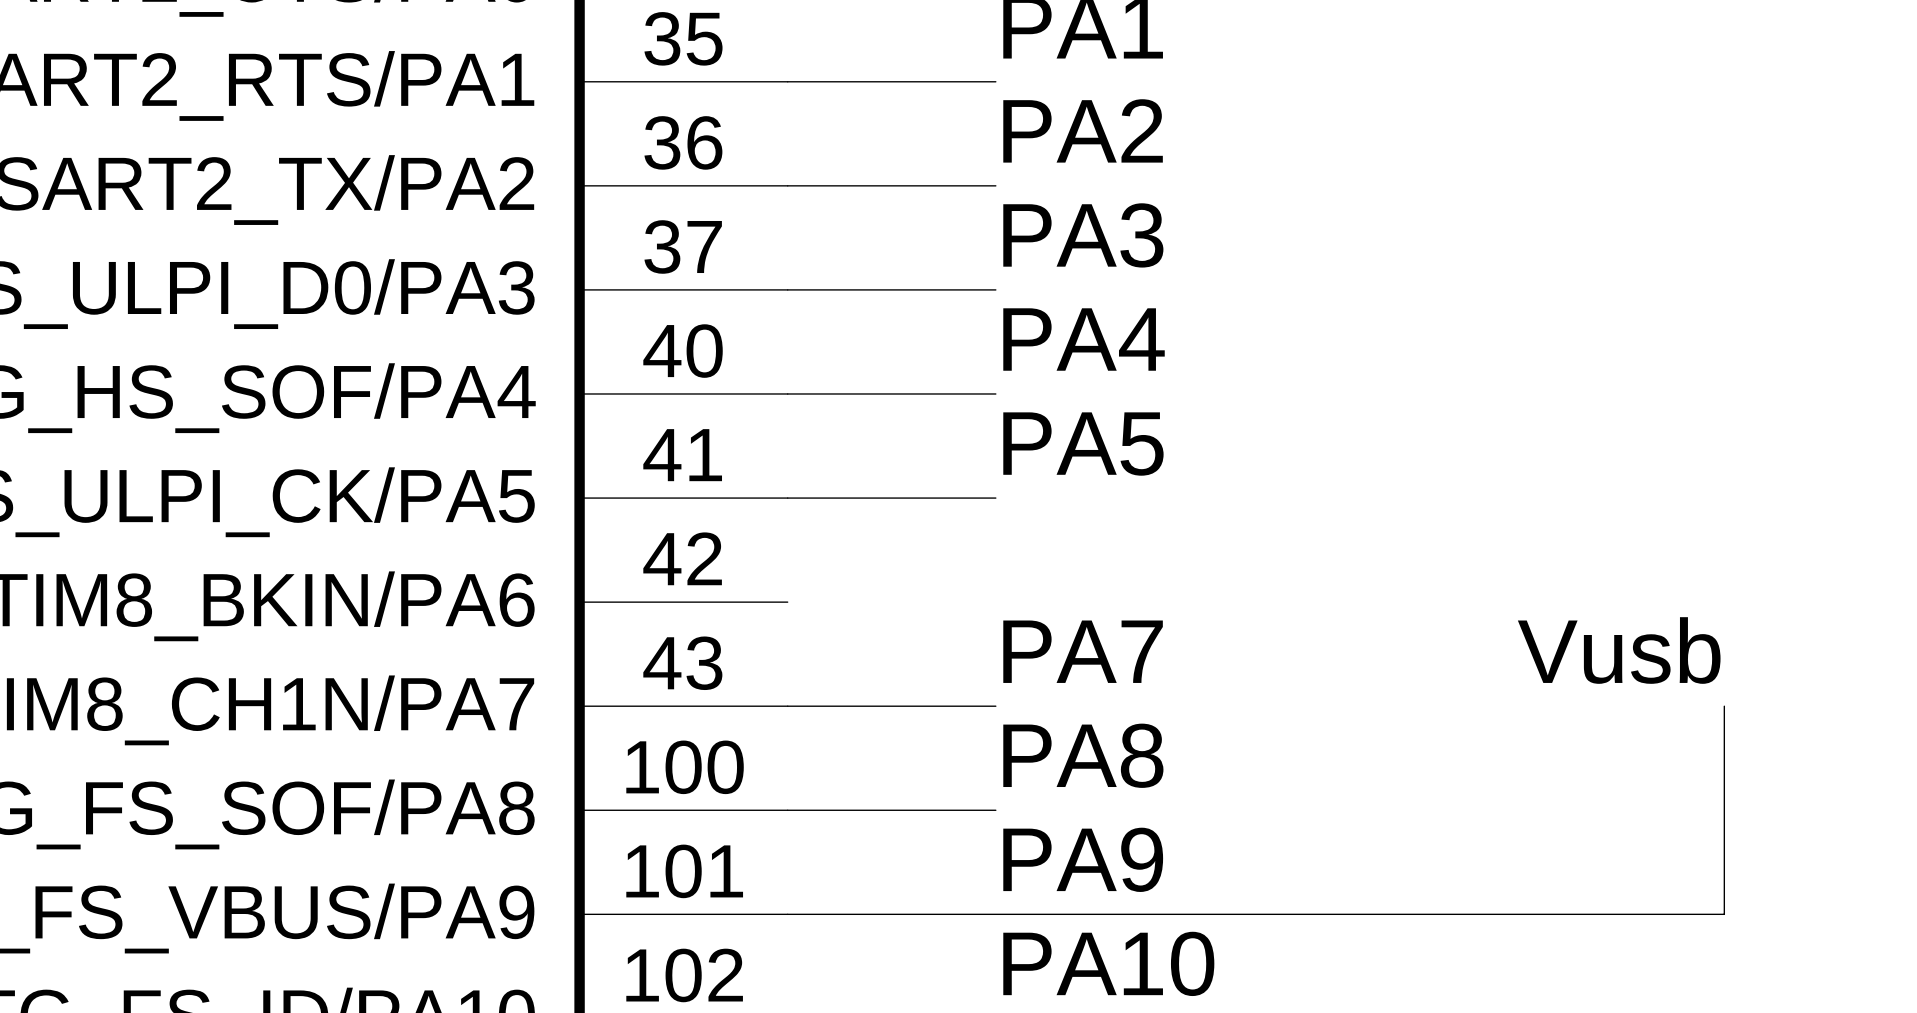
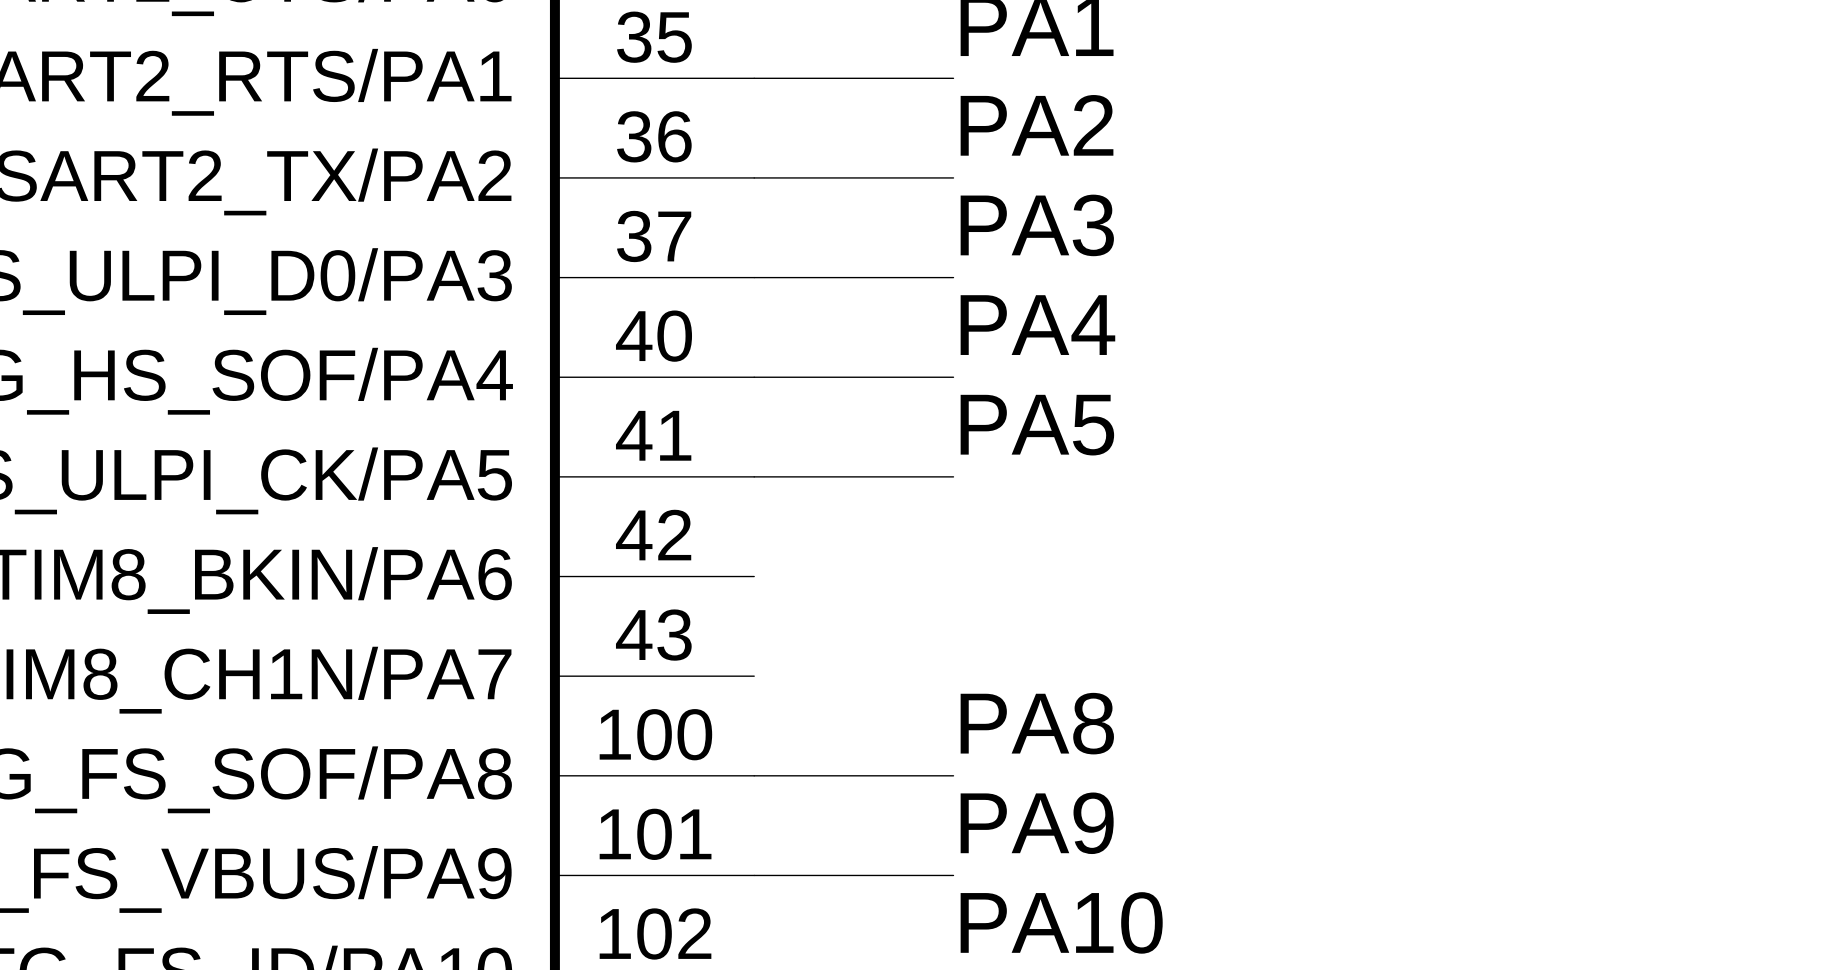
label: Vusb (1619, 650) -> none
label: PA7 (1083, 651) -> none
wire: (787, 706) (995, 706) -> none
wire: (1724, 706) (1724, 914) (995, 914) -> none

